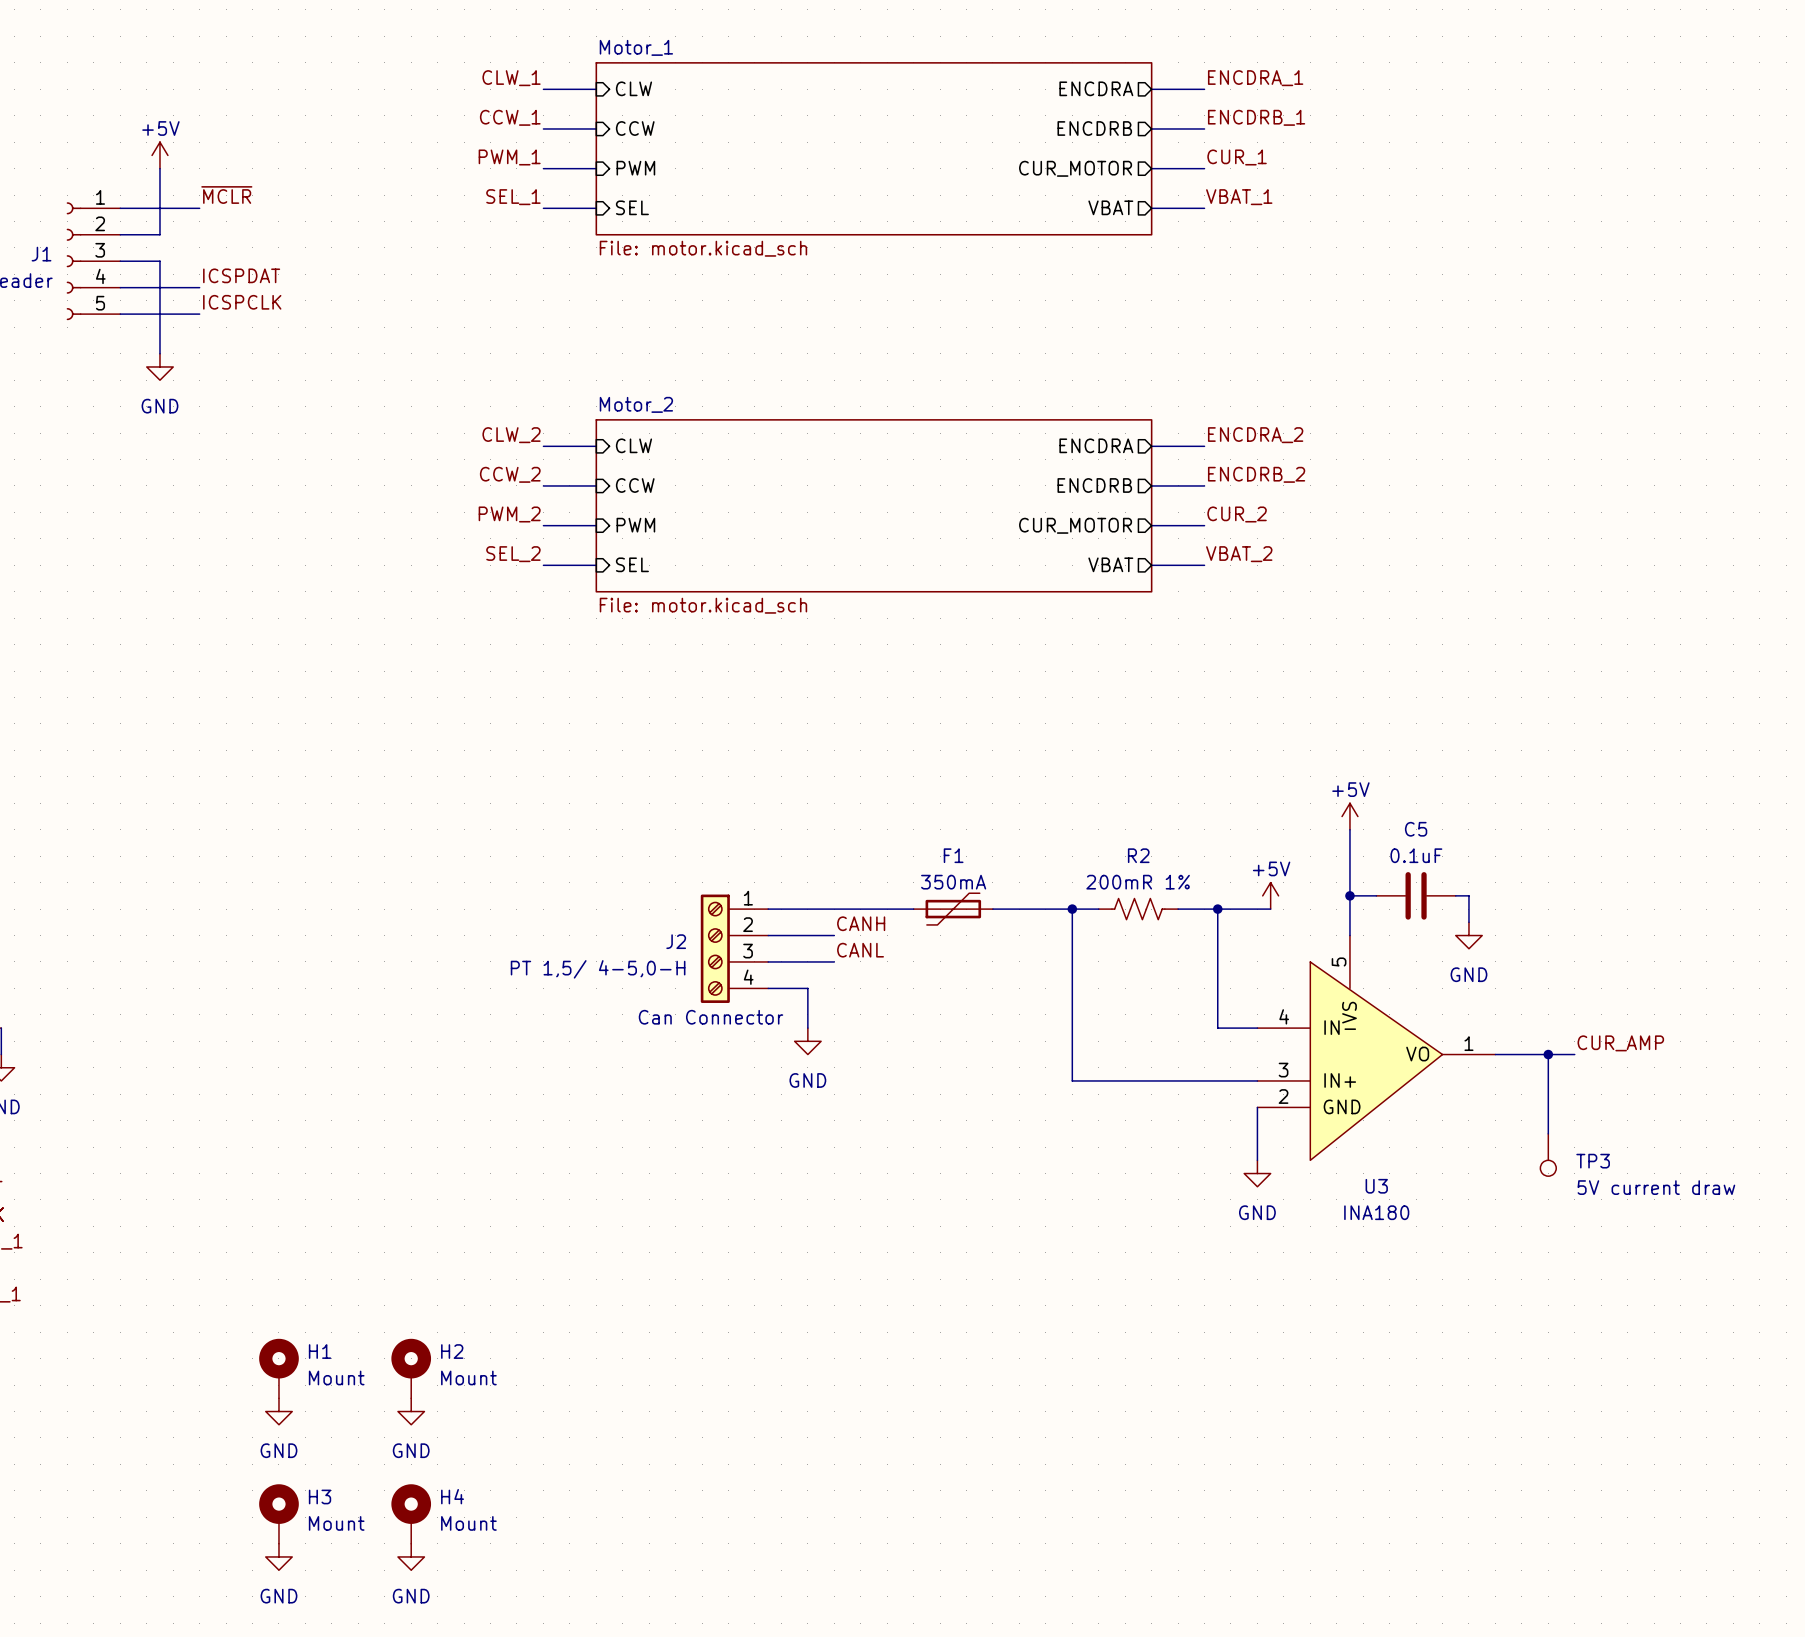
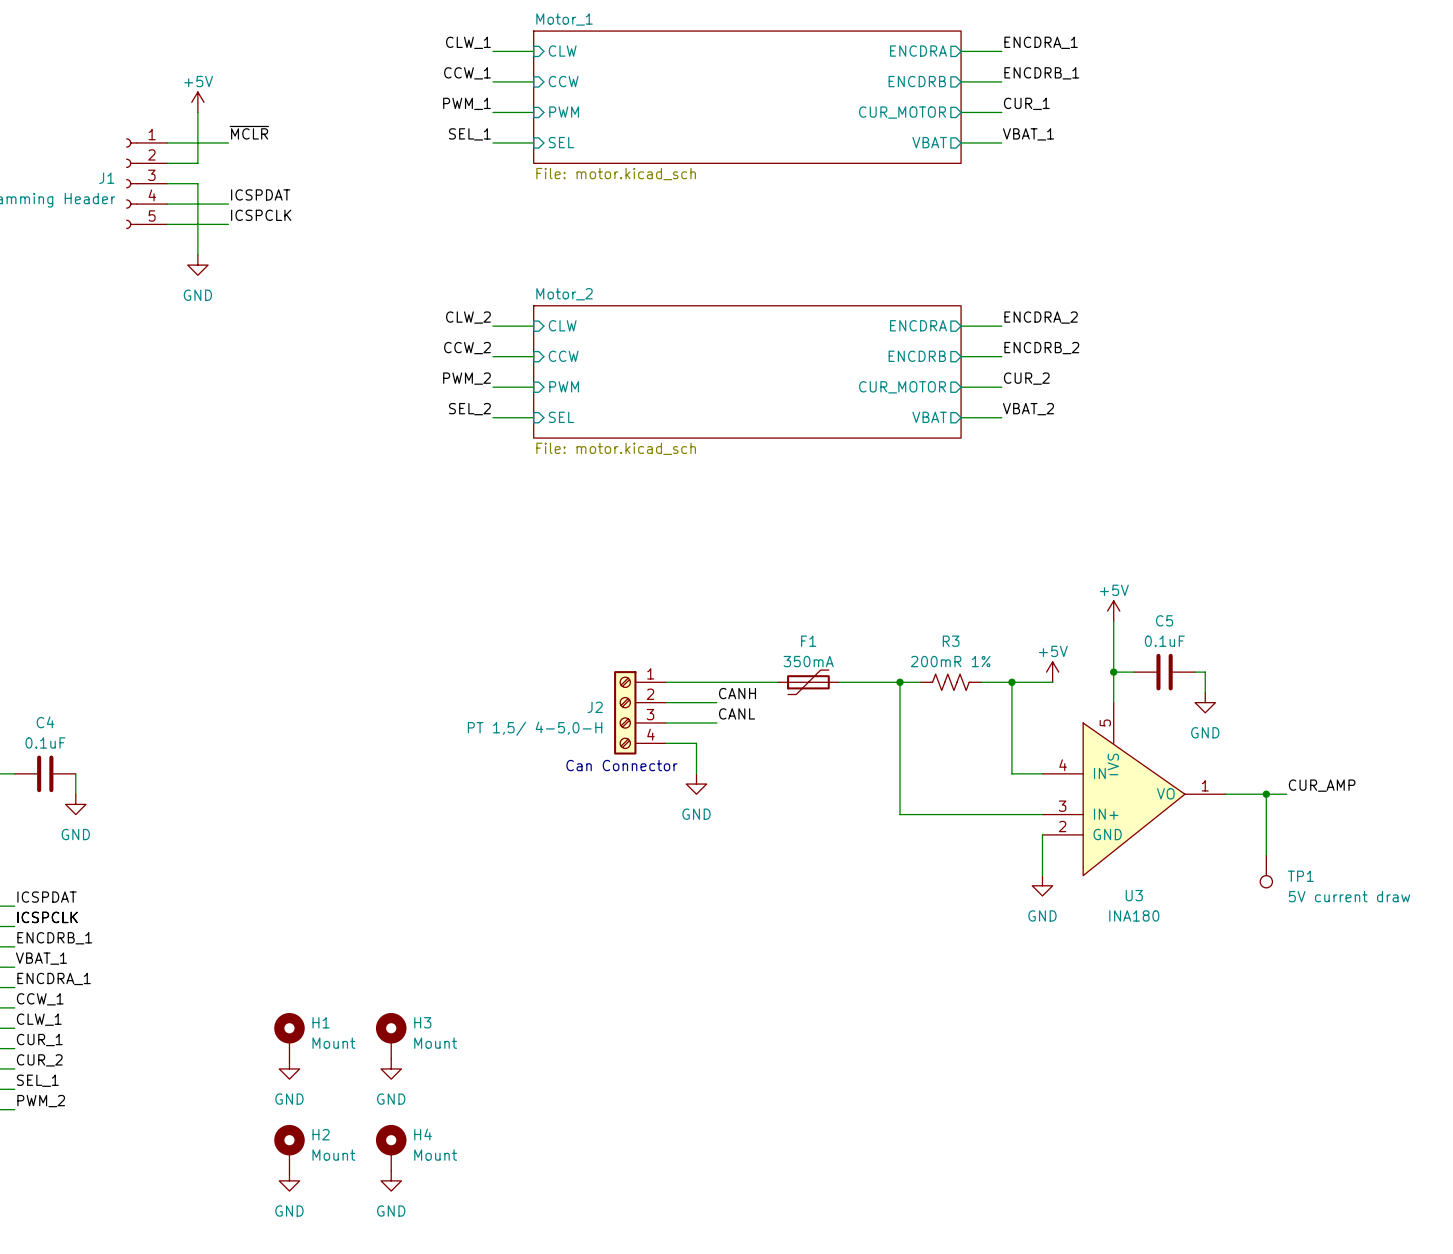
R2 name: R2 (1138, 855) -> R3 (951, 641)
TP3 name: TP3 (1593, 1161) -> TP1 (1300, 876)
H2 name: H2 (452, 1351) -> H3 (422, 1022)
H3 name: H3 (320, 1496) -> H2 (321, 1134)

